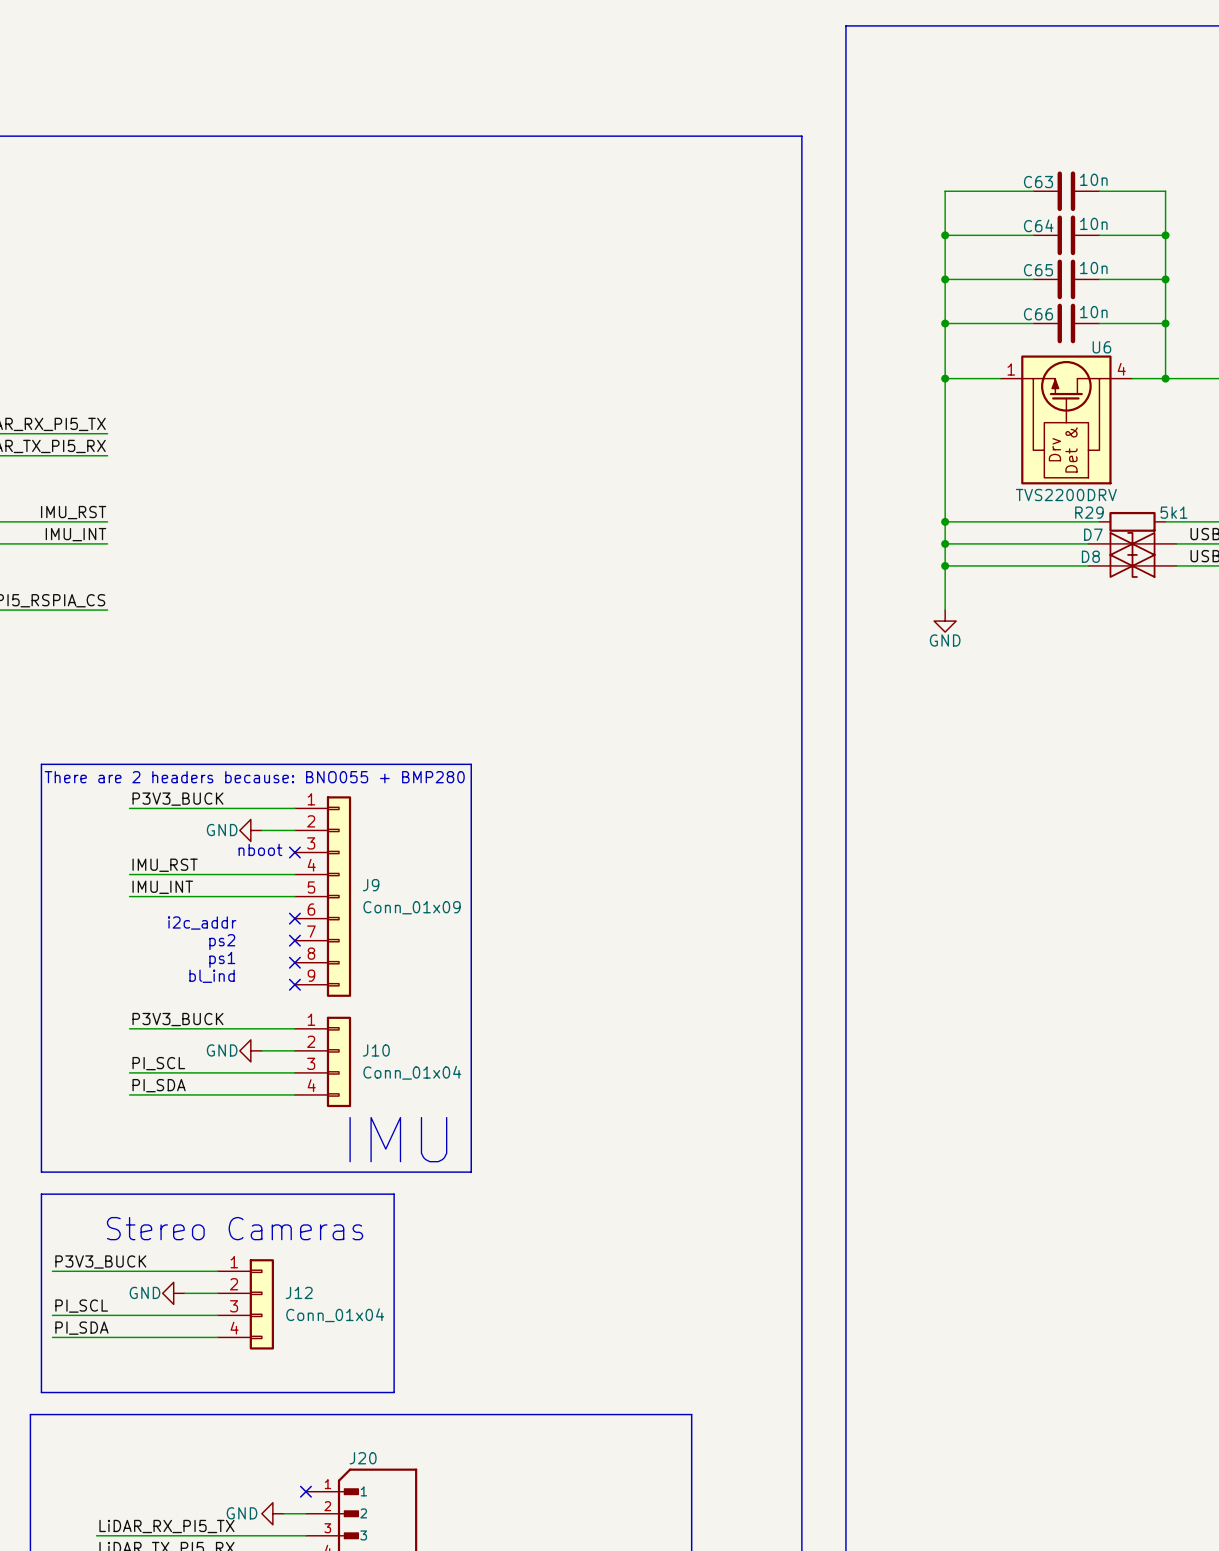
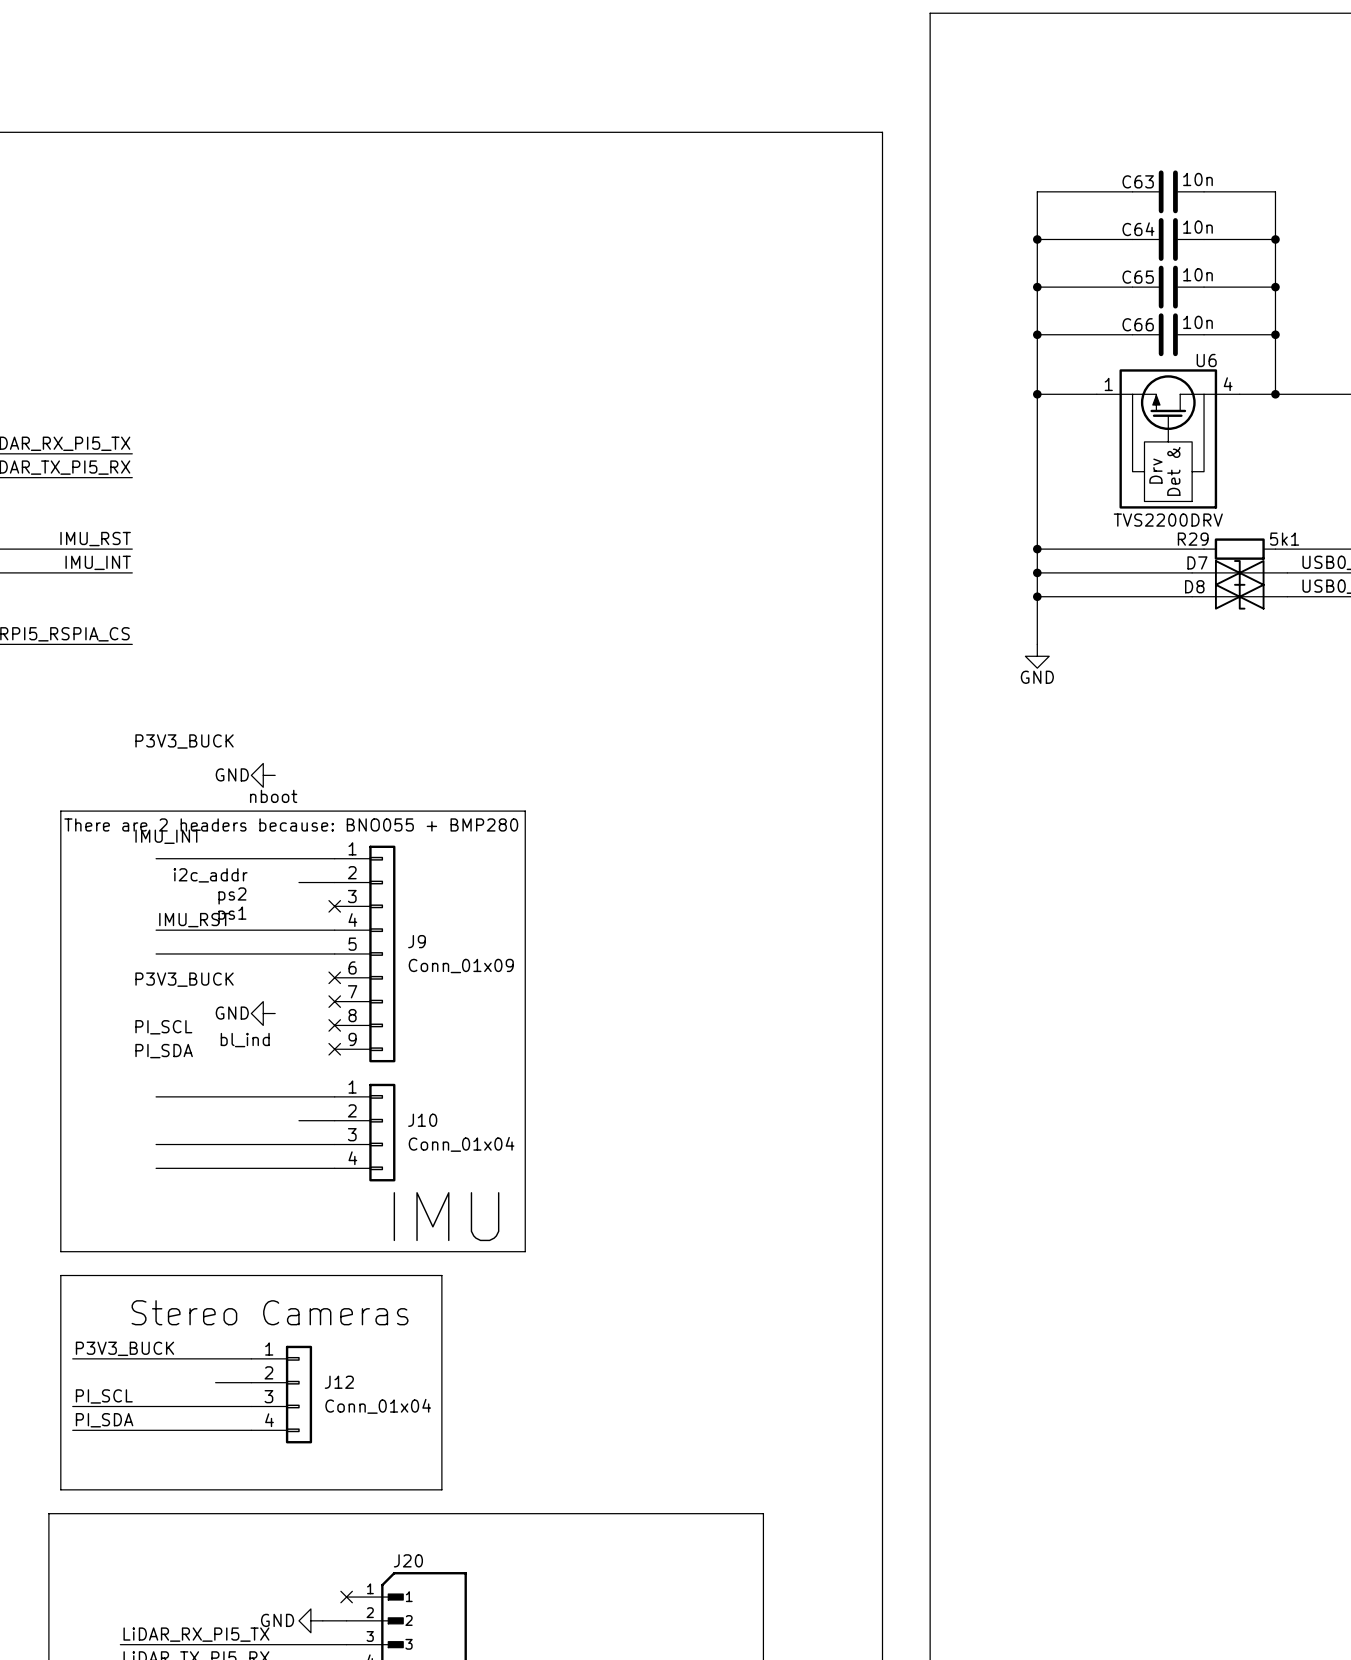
label: none -> P3V3_BUCK (184, 741)
power symbol: none -> GND (263, 775)
label: P3V3_BUCK (177, 799) -> none
power symbol: GND (250, 830) -> none
text position: nboot (260, 849) -> nboot (273, 796)
label position: IMU_INT (162, 887) -> IMU_INT (168, 836)
label: none -> P3V3_BUCK (184, 979)
text position: i2c_addr (202, 923) -> i2c_addr (210, 875)
text position: ps2 (222, 942) -> ps2 (232, 895)
power symbol: none -> GND (263, 1013)
text position: ps1 (222, 959) -> ps1 (232, 915)
label: P3V3_BUCK (177, 1019) -> none
power symbol: GND (250, 1050) -> none
label position: PI_SCL (158, 1063) -> PI_SCL (163, 1027)
label position: PI_SDA (159, 1085) -> PI_SDA (164, 1051)
power symbol: GND (173, 1293) -> none

